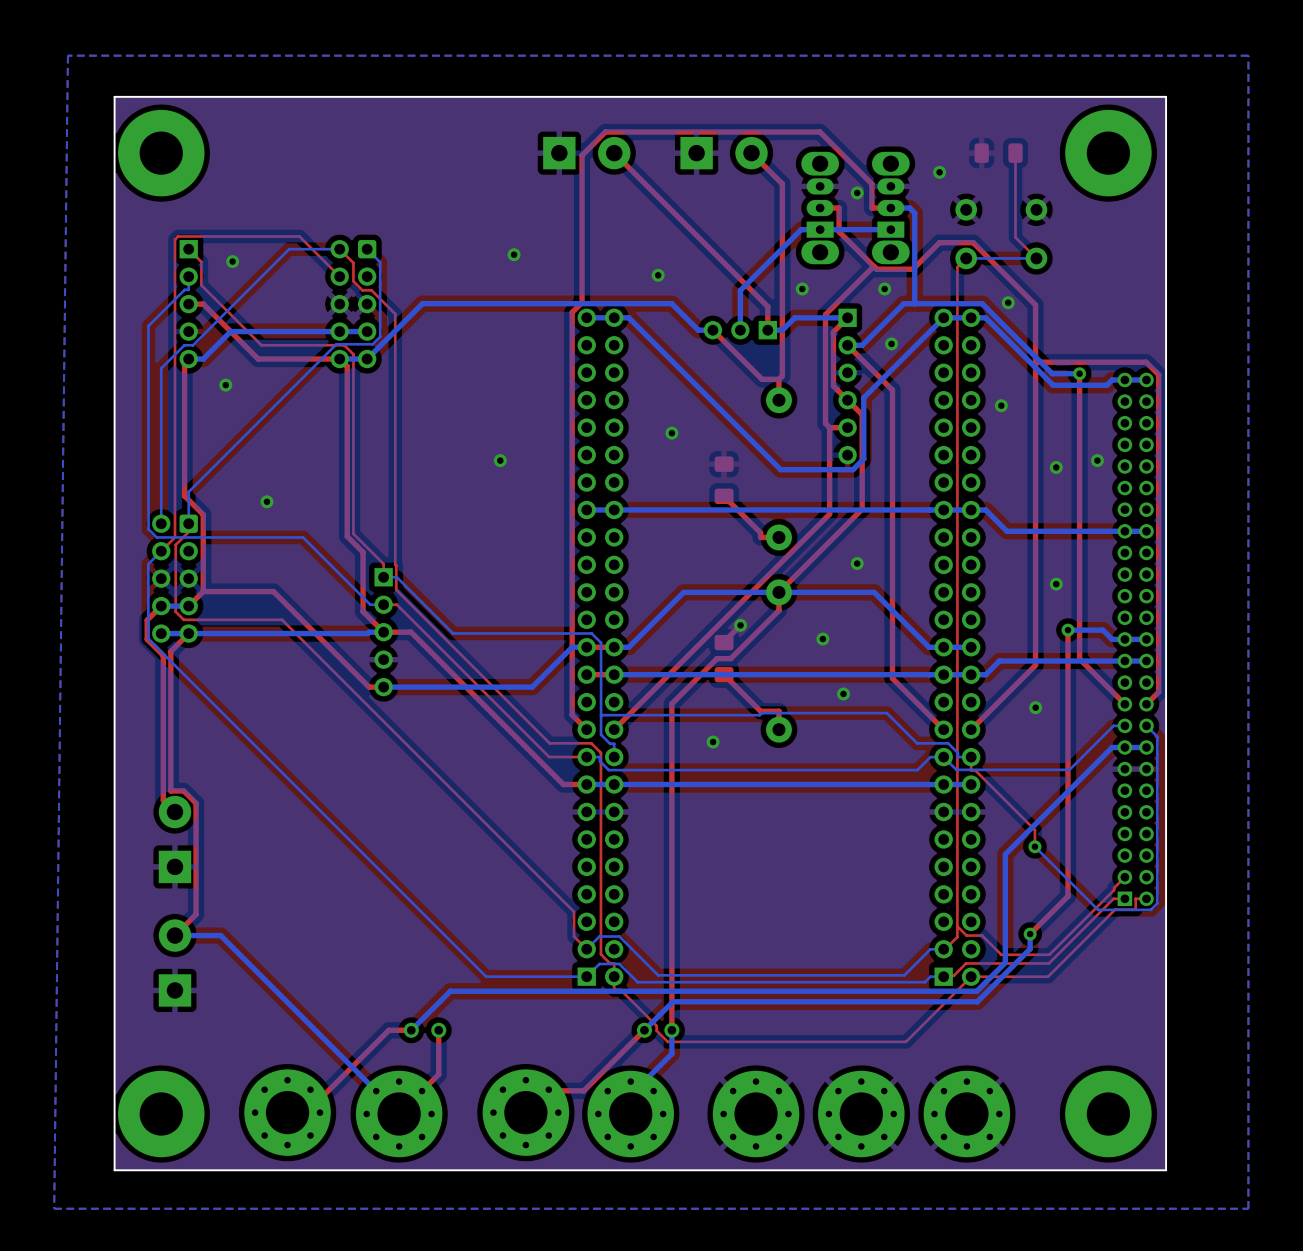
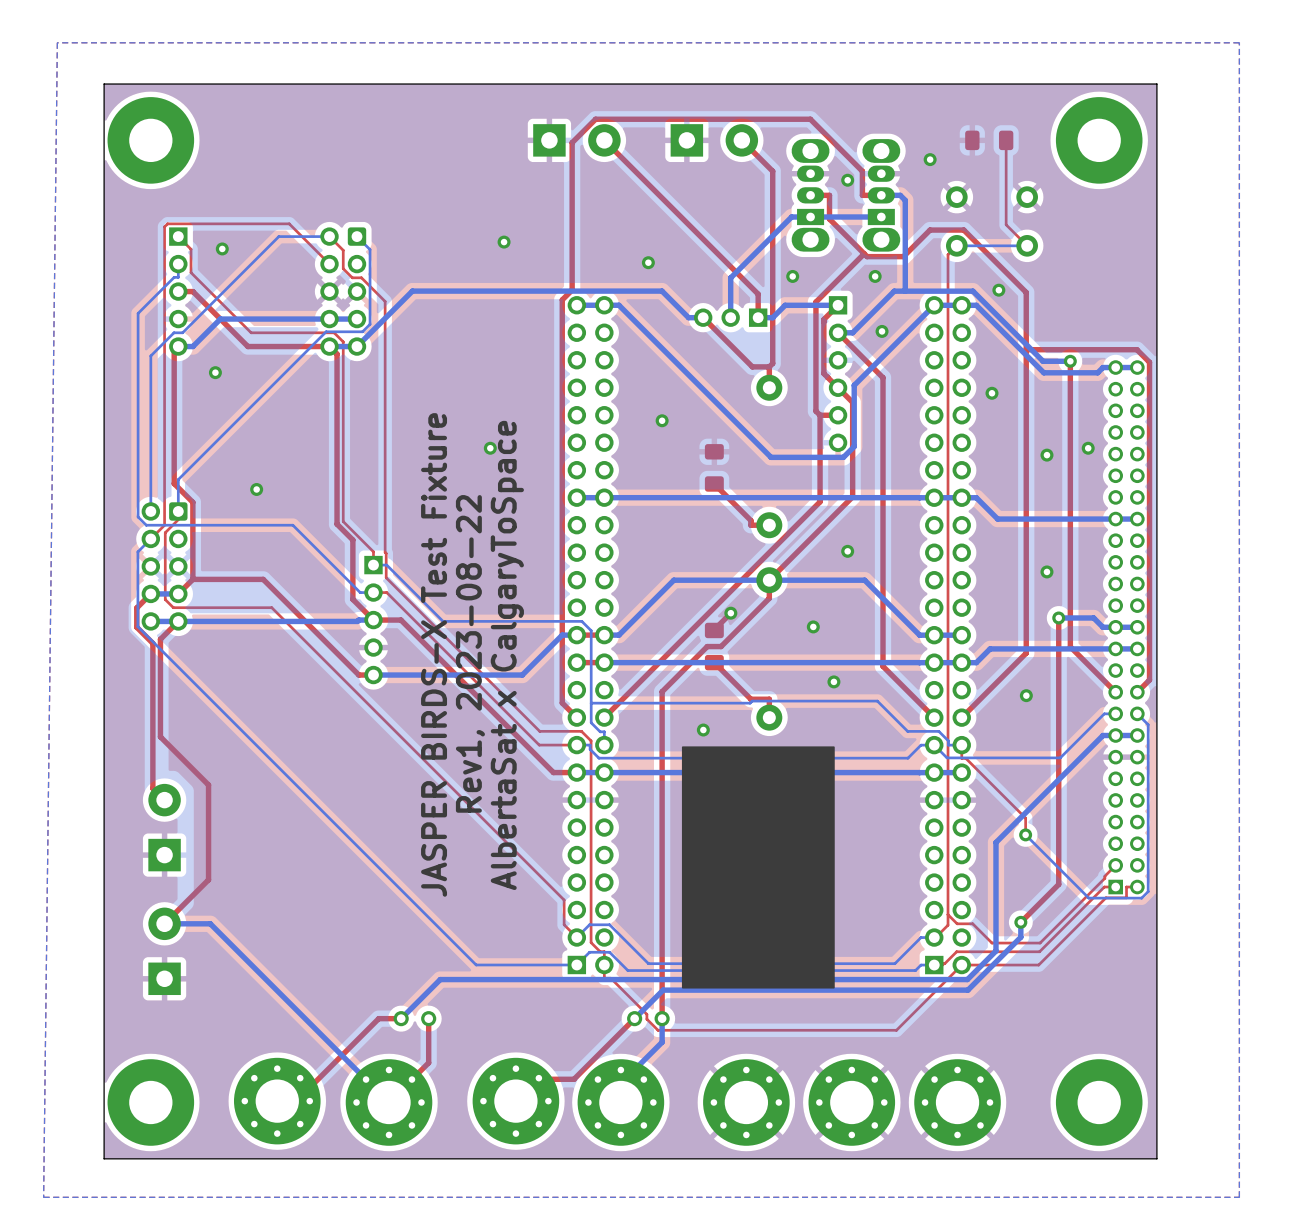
text: none -> Rev1, 2023-08-22 (470, 653)
text: none -> JASPER BIRDS-X Test Fixture (434, 654)
text: none -> AlbertaSat x CalgaryToSpace (507, 655)
top track: (170, 748) (170, 790) (183, 790) (196, 803) (196, 914) -> (160, 736) (208, 784) (208, 879) (185, 902)
drawing: none -> [681, 746, 835, 989]

